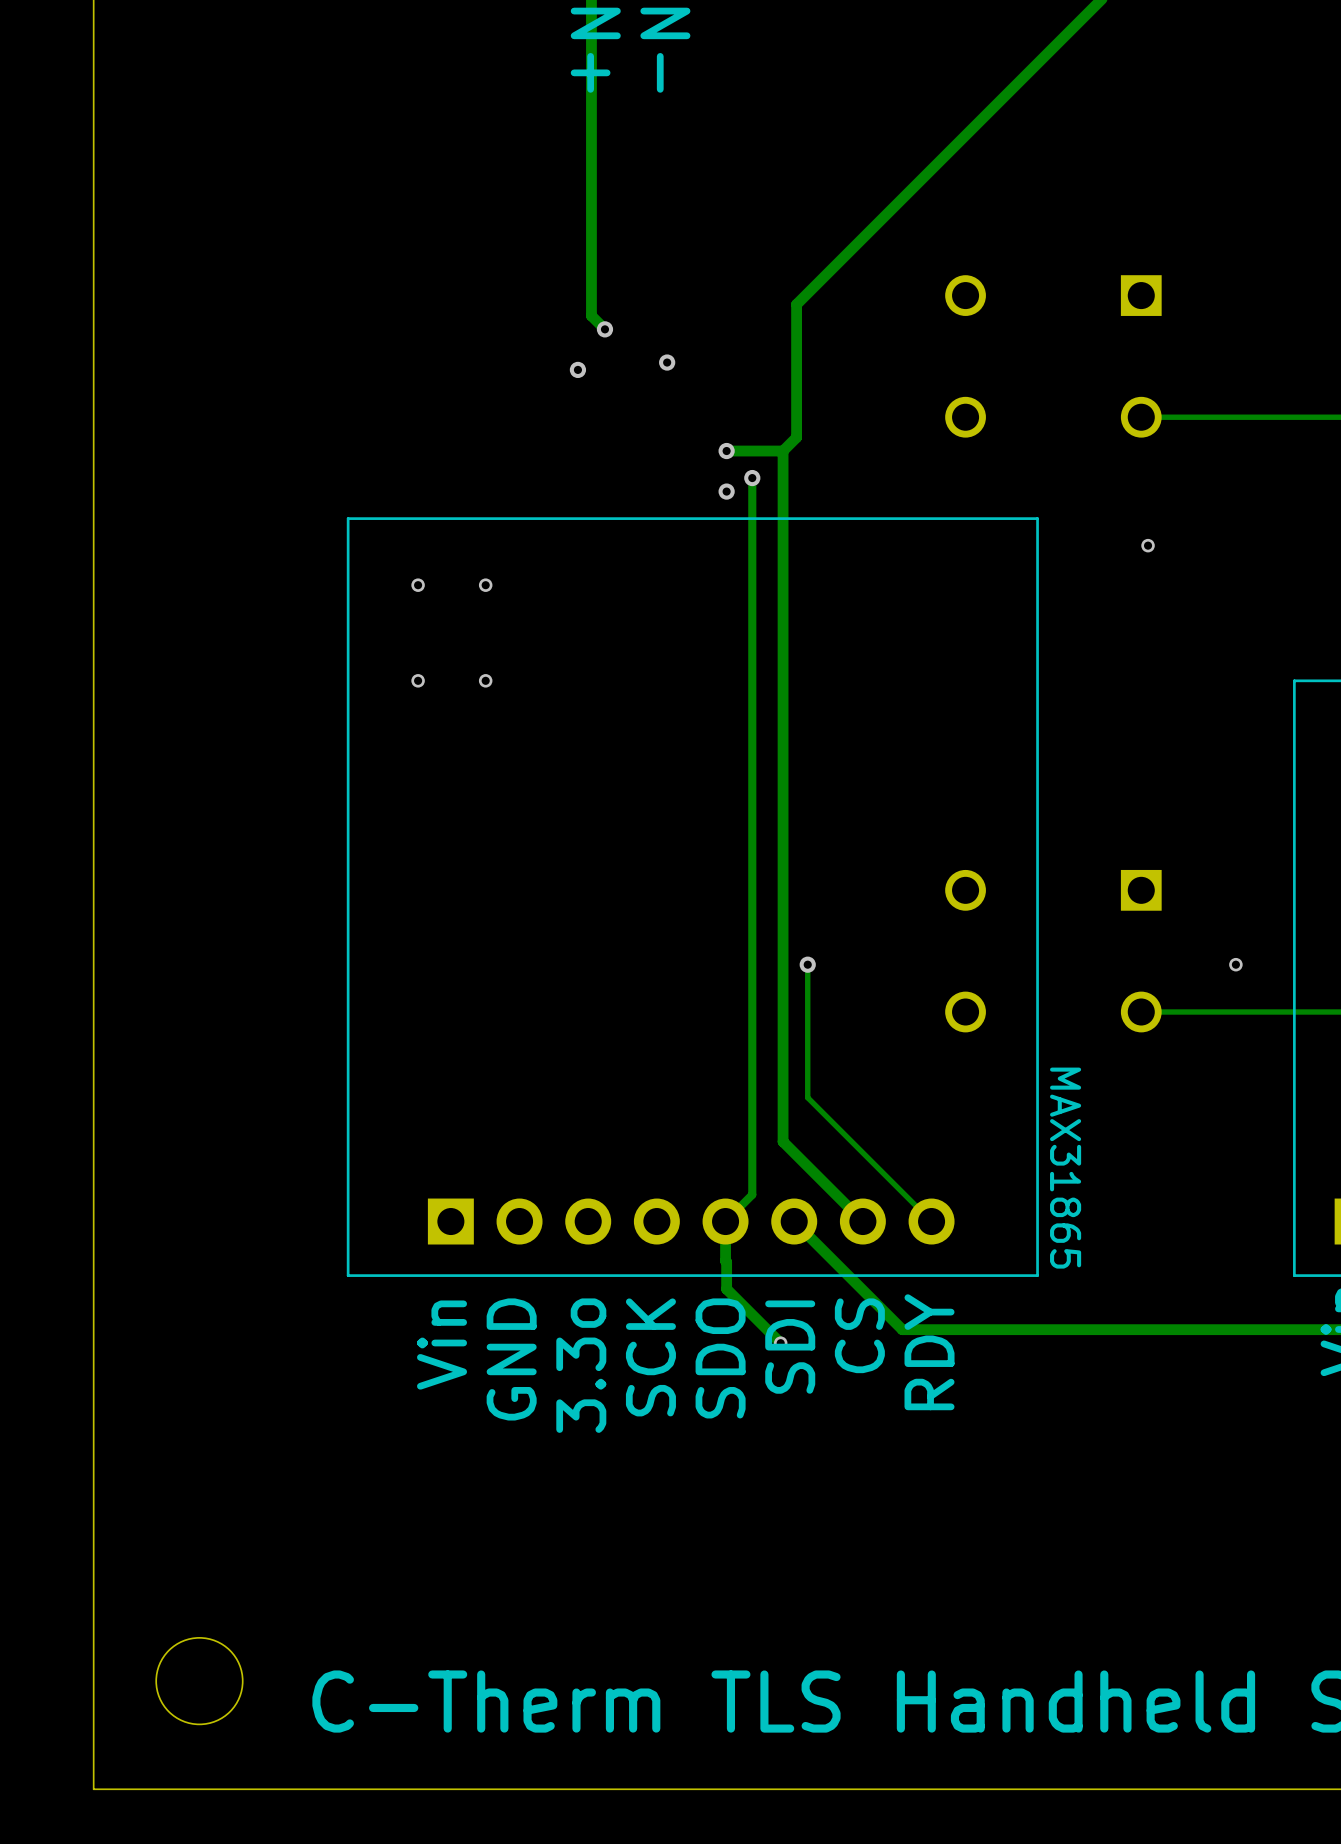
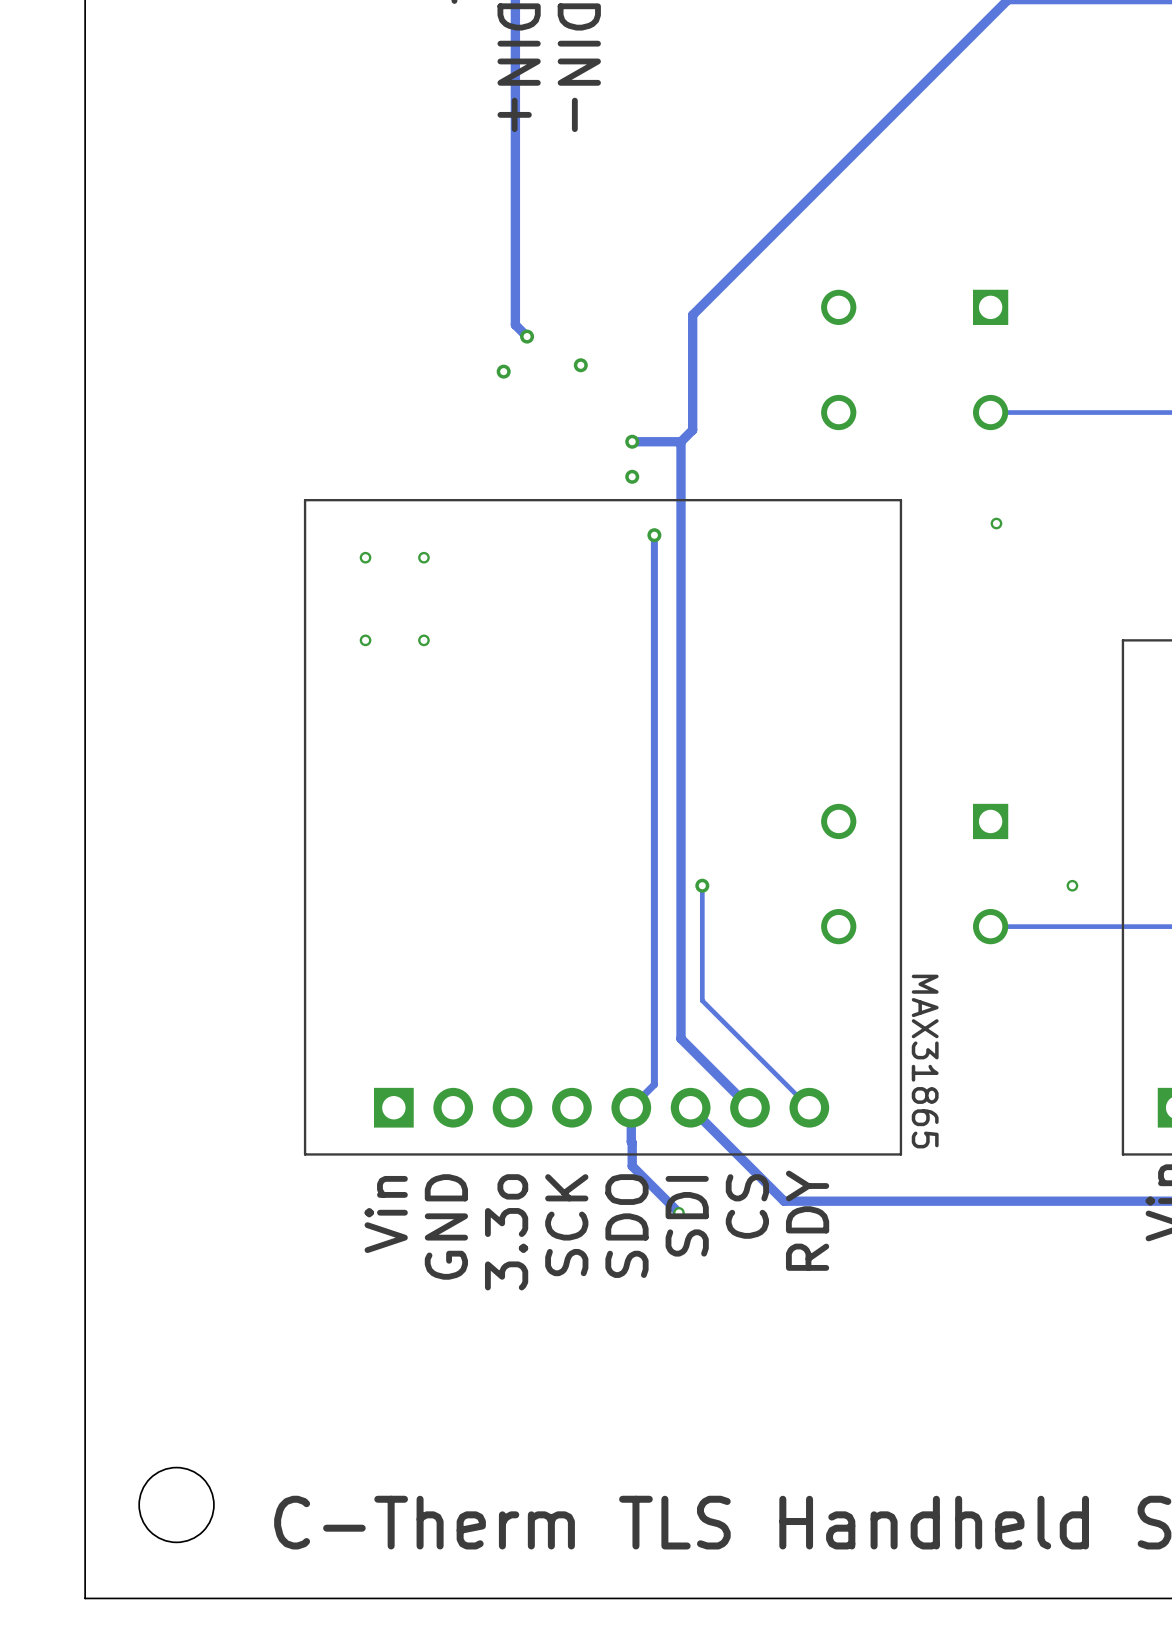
track: (752, 478) (752, 559) -> none
via position: (752, 478) -> (654, 535)

